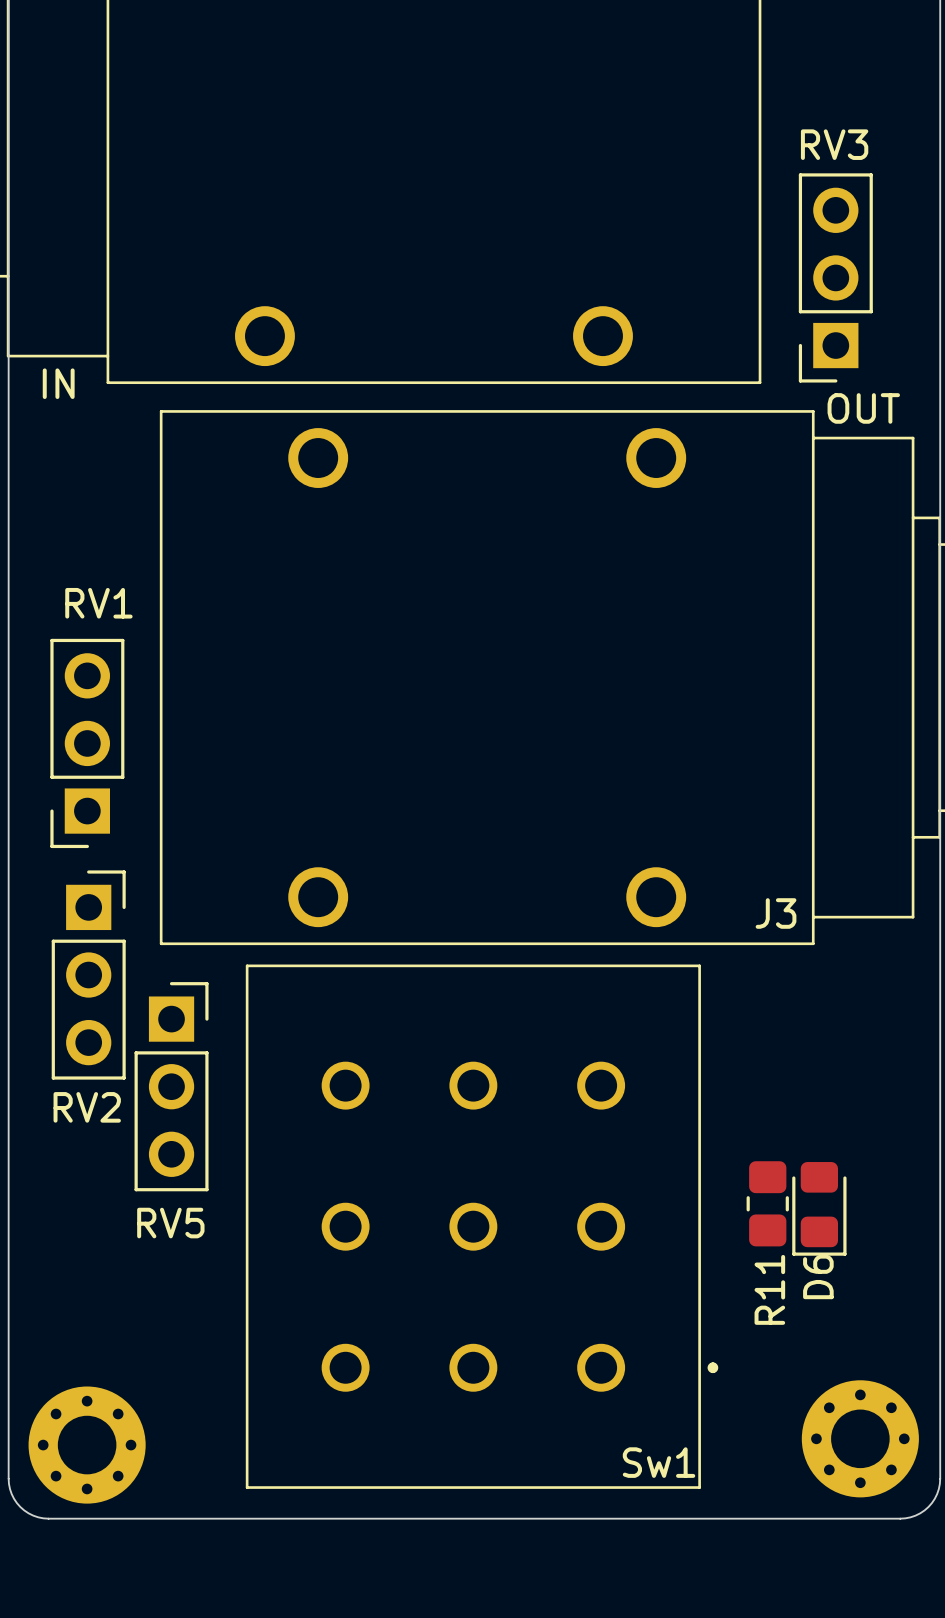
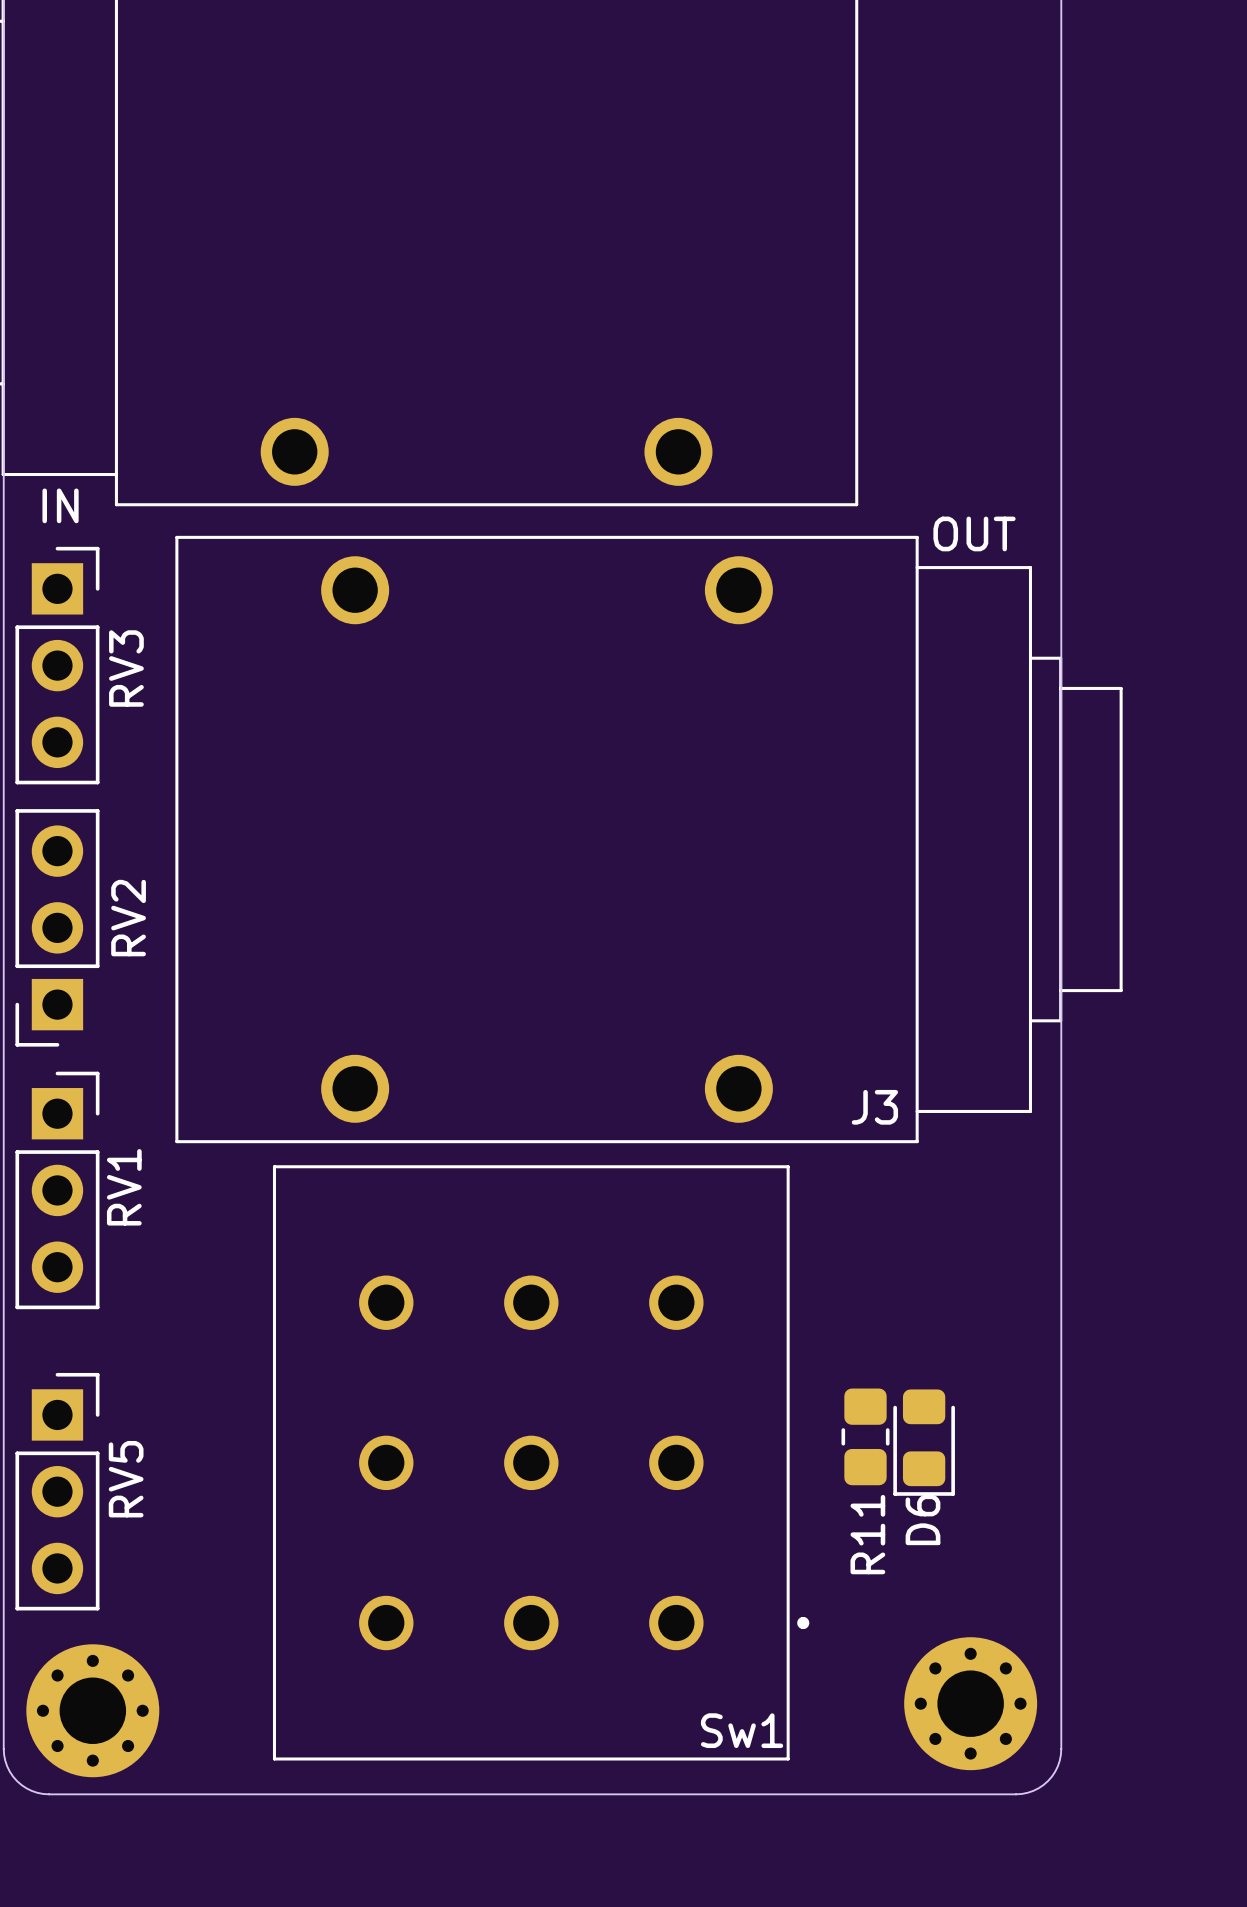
RV3 name position: RV3 (834, 144) -> RV3 (126, 668)
RV3 rotation: 0° (835, 277) -> 180° (57, 665)
RV3 position: (835, 277) -> (57, 665)
RV1 name rotation: 0° (98, 603) -> 90° counterclockwise (124, 1187)
RV1 name position: RV1 (98, 603) -> RV1 (124, 1187)
RV2 position: (87, 743) -> (57, 927)
RV1 position: (88, 975) -> (57, 1190)
RV5 position: (171, 1086) -> (57, 1491)
RV2 name rotation: 0° (87, 1107) -> 90° counterclockwise (128, 918)
RV2 name position: RV2 (87, 1107) -> RV2 (128, 918)
RV5 name rotation: 0° (170, 1223) -> 90° counterclockwise (126, 1479)

